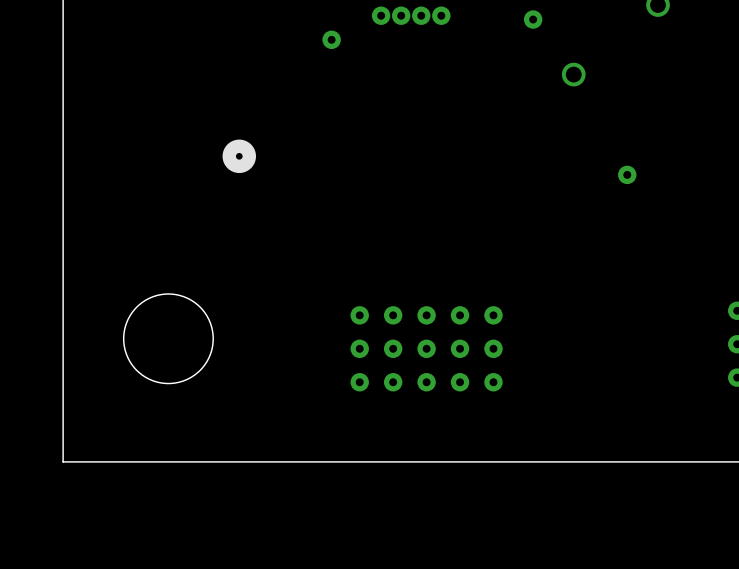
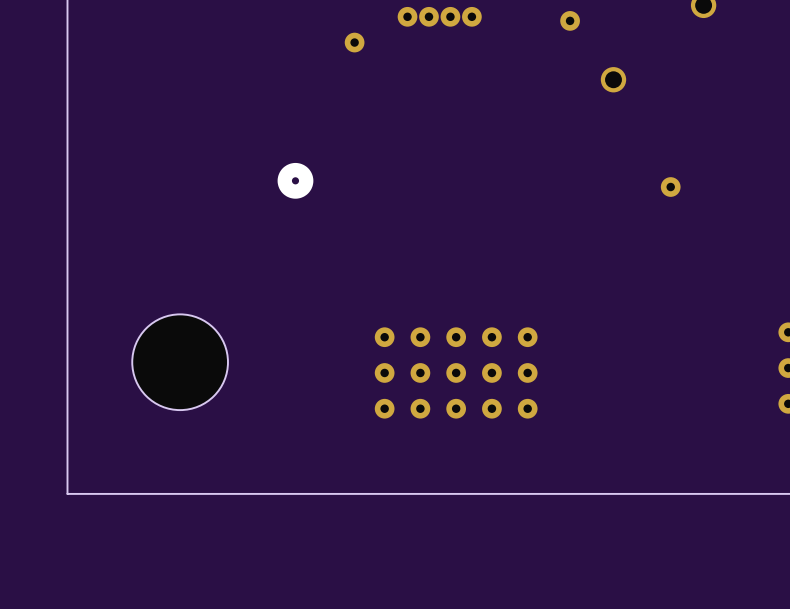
part position: (239, 156) -> (295, 180)

